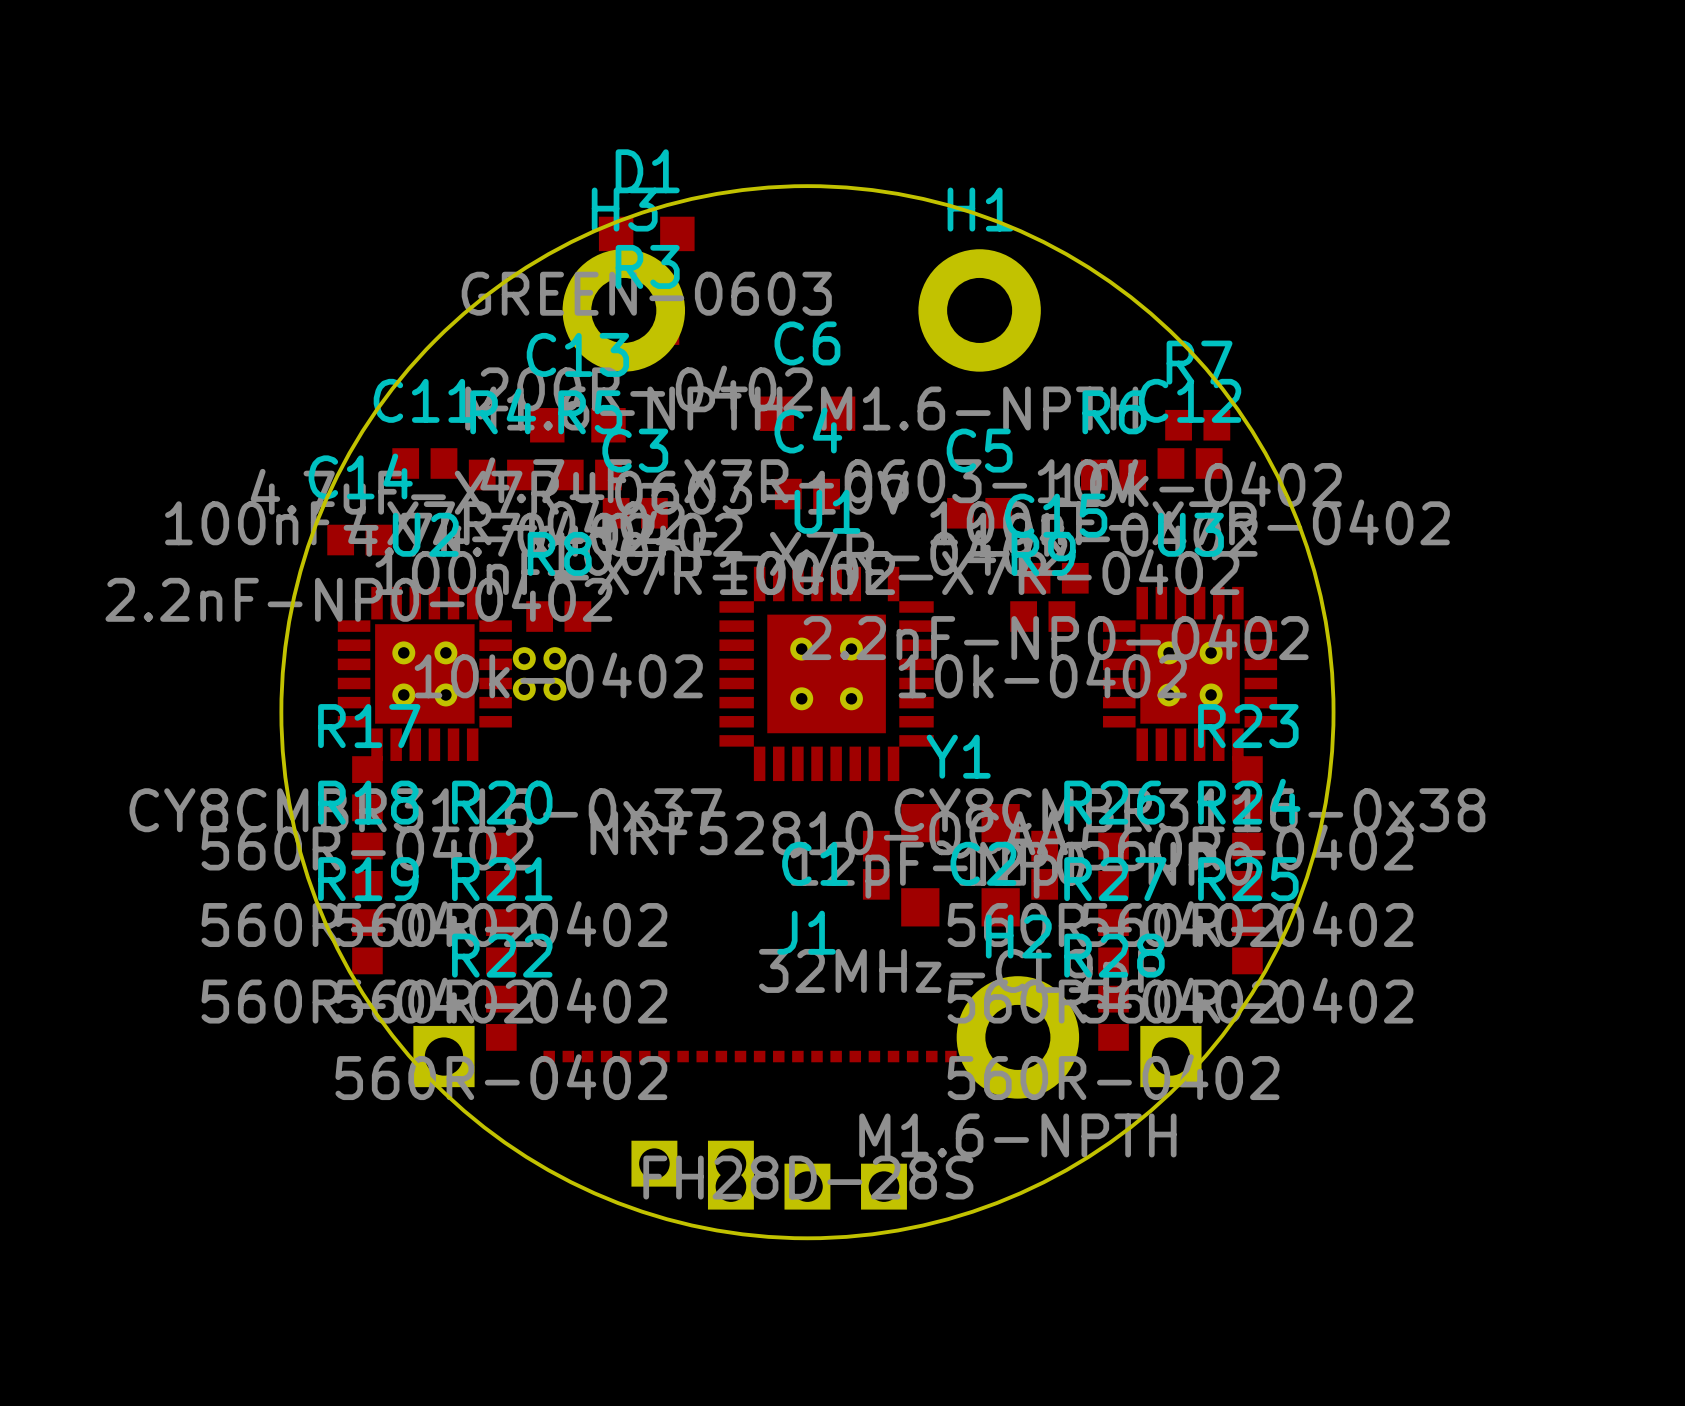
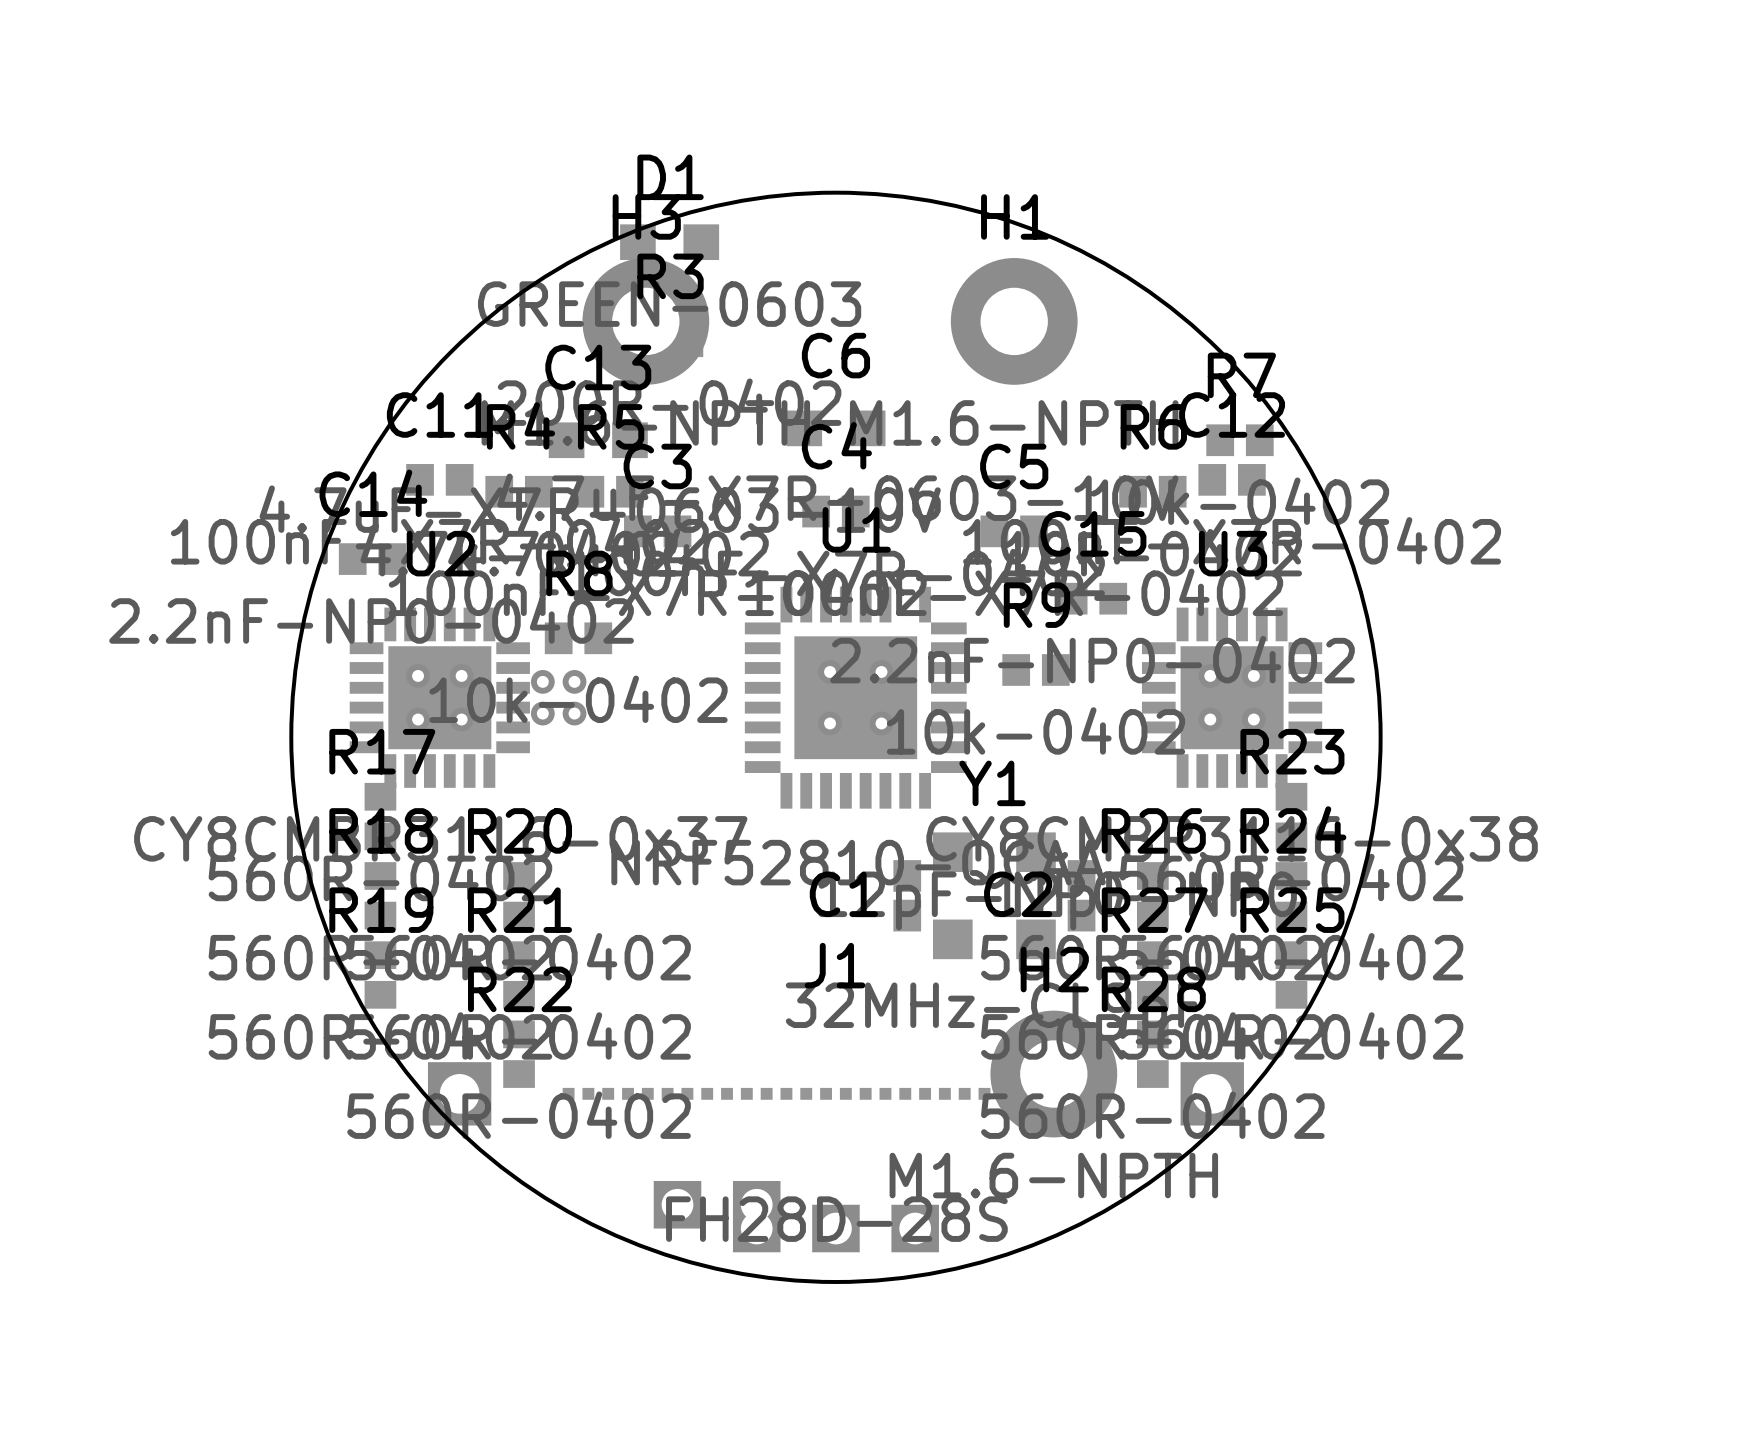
R9 position: (1042, 616) -> (1035, 669)

